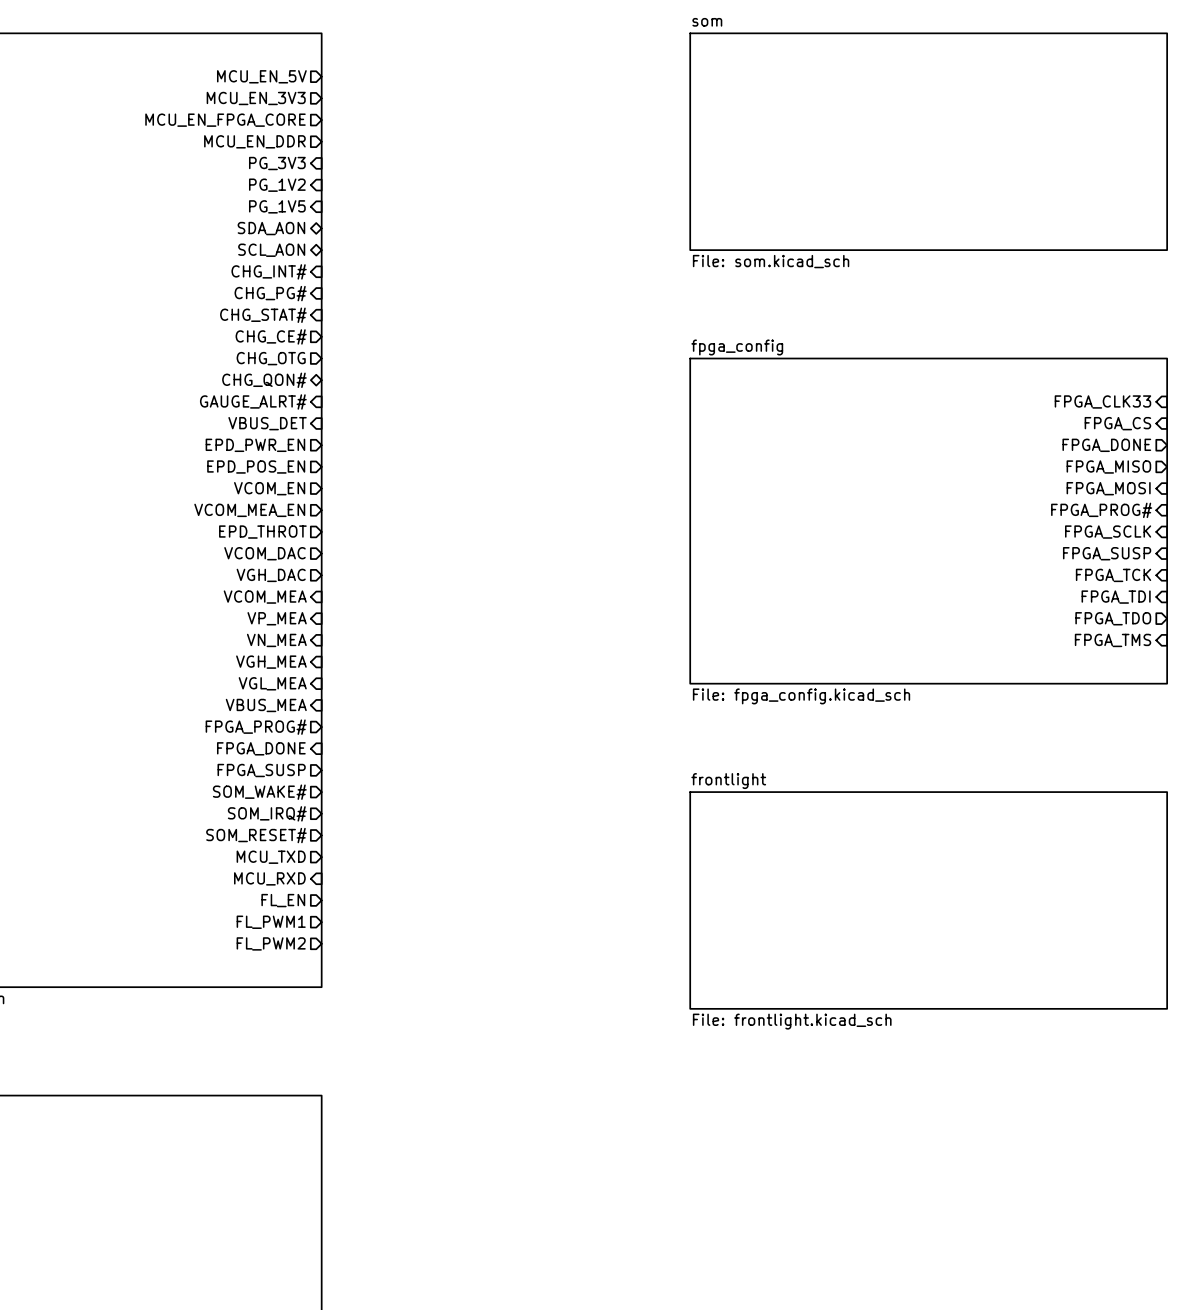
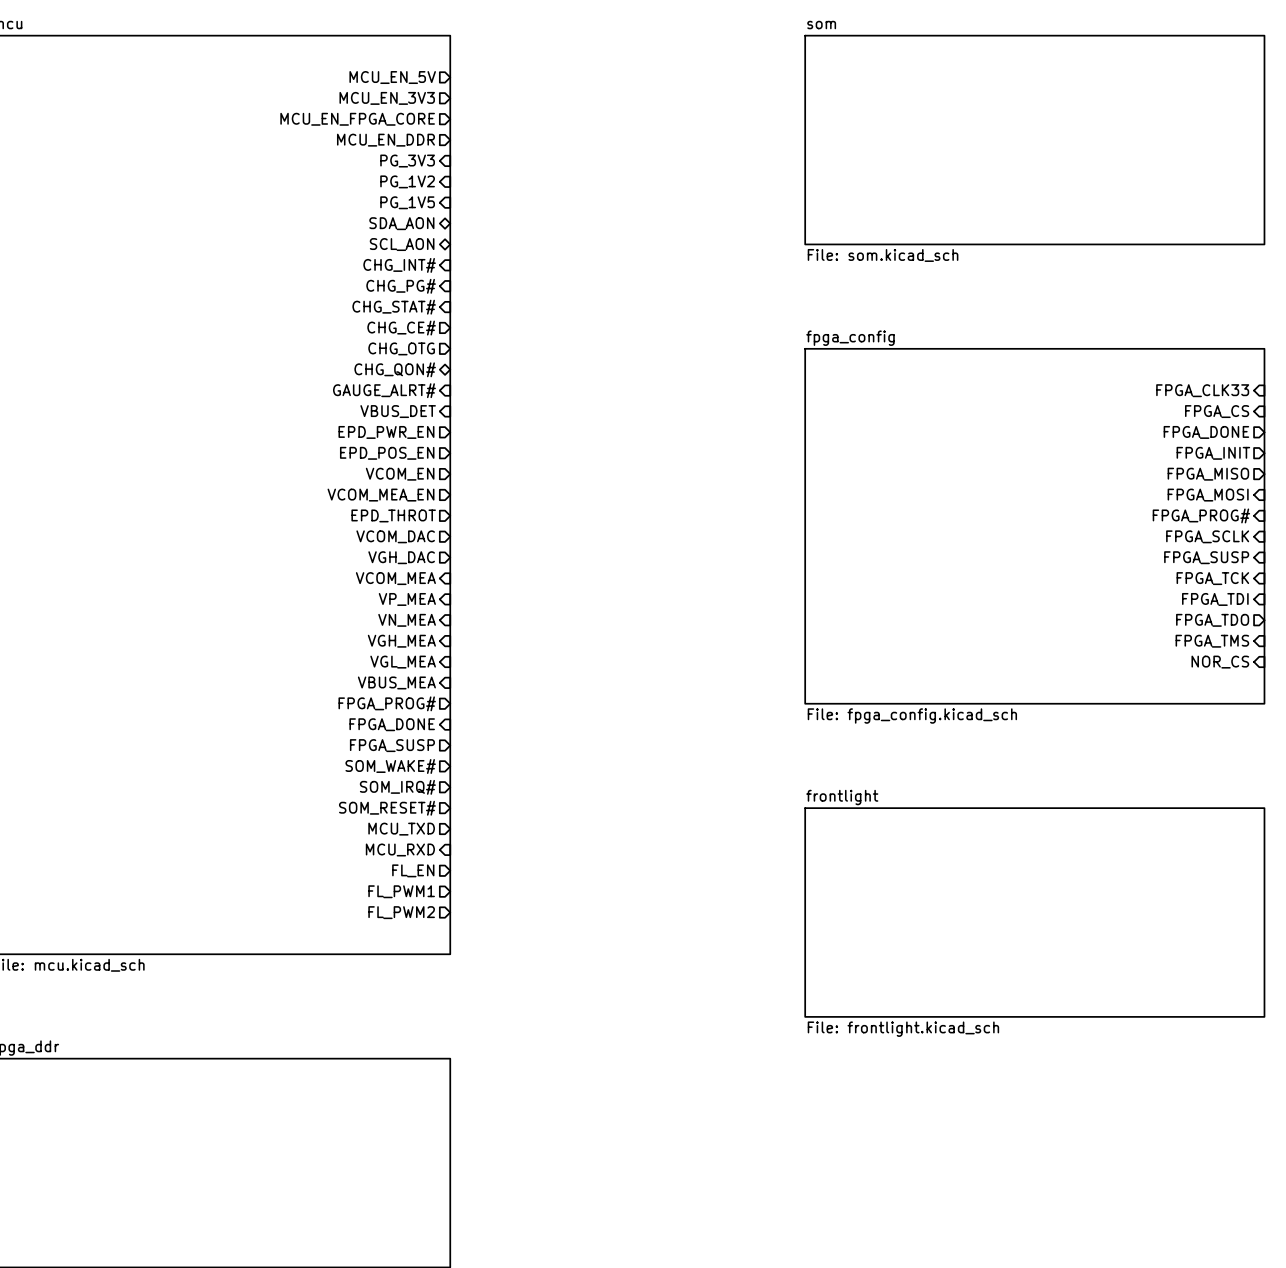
sheet pin: FPGA_MISO (1108, 467) -> FPGA_INIT (1213, 453)
sheet pin shape: input (1108, 488) -> output (1208, 474)
sheet pin: FPGA_MOSI (1108, 488) -> FPGA_MISO (1208, 474)
sheet pin: FPGA_PROG# (1101, 510) -> FPGA_MOSI (1208, 495)
sheet fpga_config: File: fpga_config.kicad_sch (928, 521) -> none
sheet pin: FPGA_SCLK (1108, 532) -> FPGA_PROG# (1201, 515)
sheet fpga_config: none -> File: fpga_config.kicad_sch (1034, 526)
sheet pin: FPGA_SUSP (1107, 553) -> FPGA_SCLK (1207, 536)
sheet pin: FPGA_TCK (1113, 575) -> FPGA_SUSP (1206, 557)
sheet pin: FPGA_TDI (1116, 597) -> FPGA_TCK (1212, 578)
sheet pin shape: output (1113, 618) -> input (1215, 599)
sheet pin: FPGA_TDO (1113, 618) -> FPGA_TDI (1215, 599)
sheet pin shape: input (1113, 640) -> output (1212, 620)
sheet pin: FPGA_TMS (1113, 640) -> FPGA_TDO (1212, 620)
sheet pin: none -> FPGA_TMS (1212, 641)
sheet pin: none -> NOR_CS (1220, 662)
sheet frontlight position: (928, 900) -> (1034, 912)

